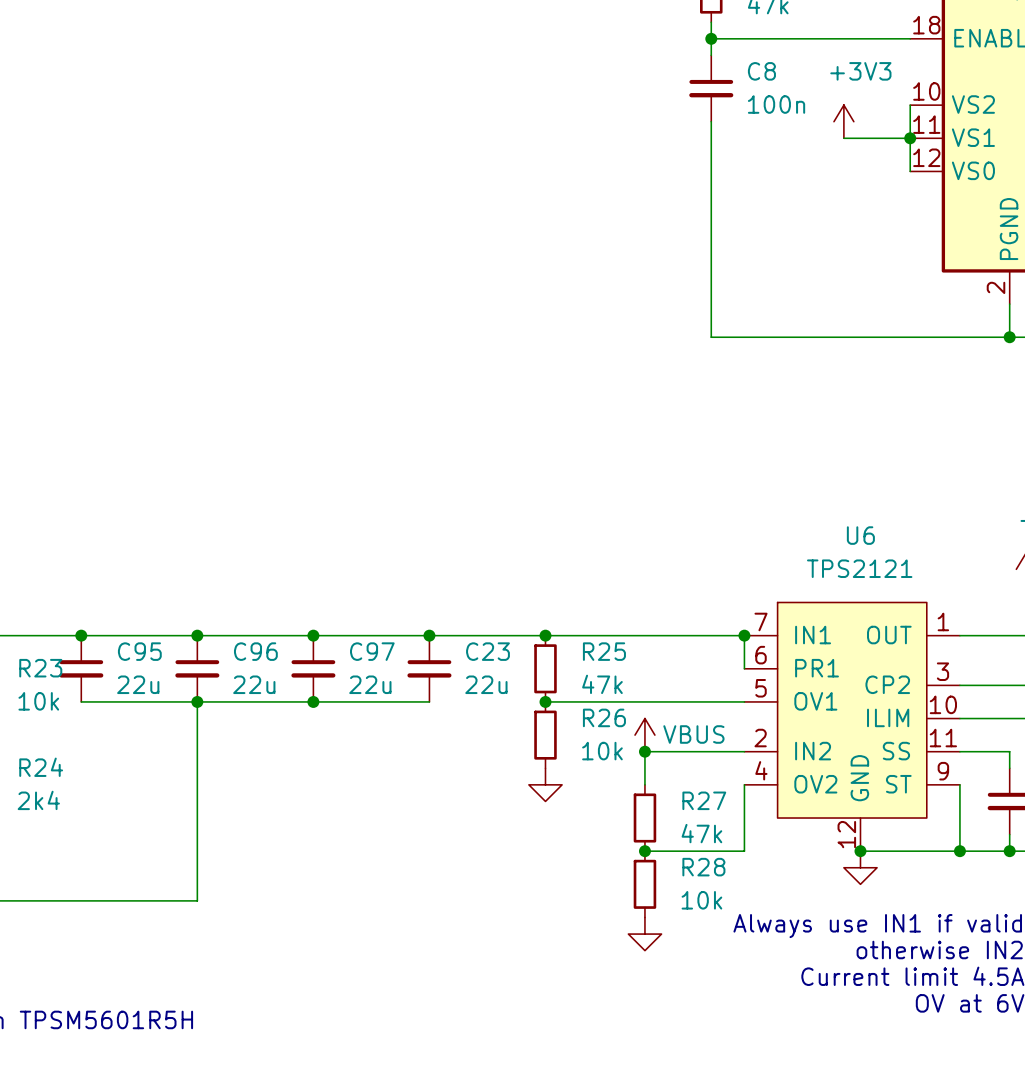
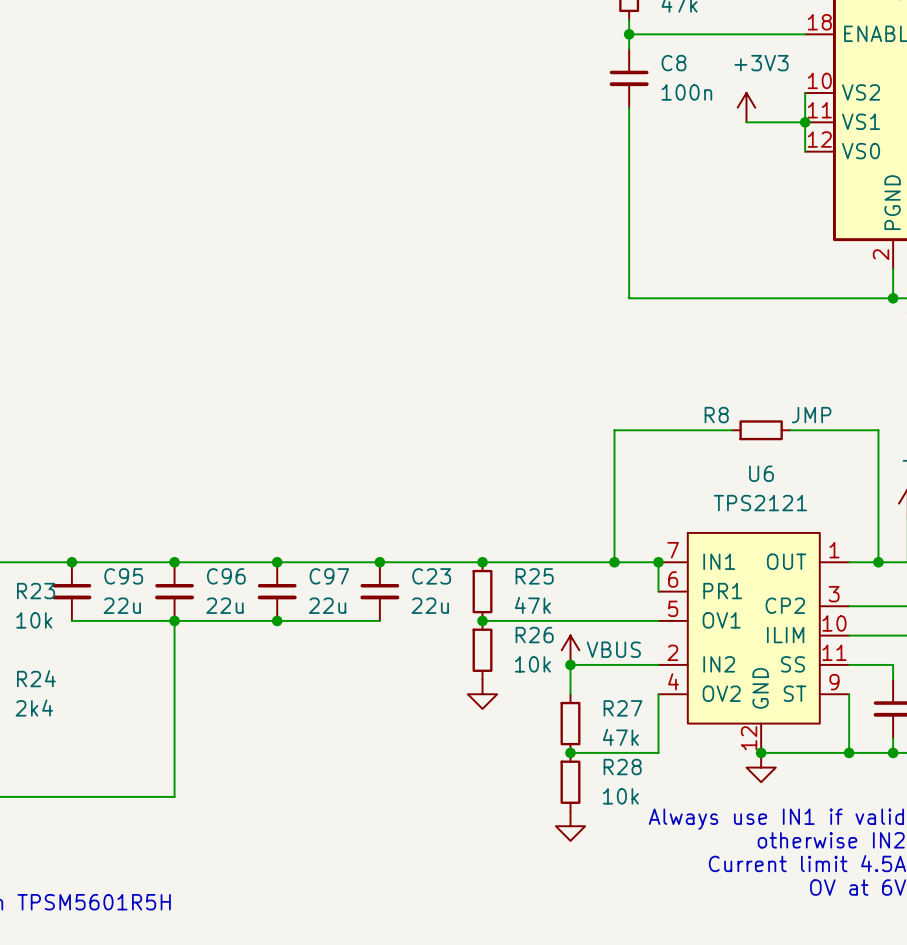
wire: none -> (731, 430) (614, 430) (614, 562)
R8: none -> JMP (761, 430)
wire: none -> (790, 430) (878, 430) (878, 562)
junction: none -> (614, 562)
junction: none -> (878, 562)

